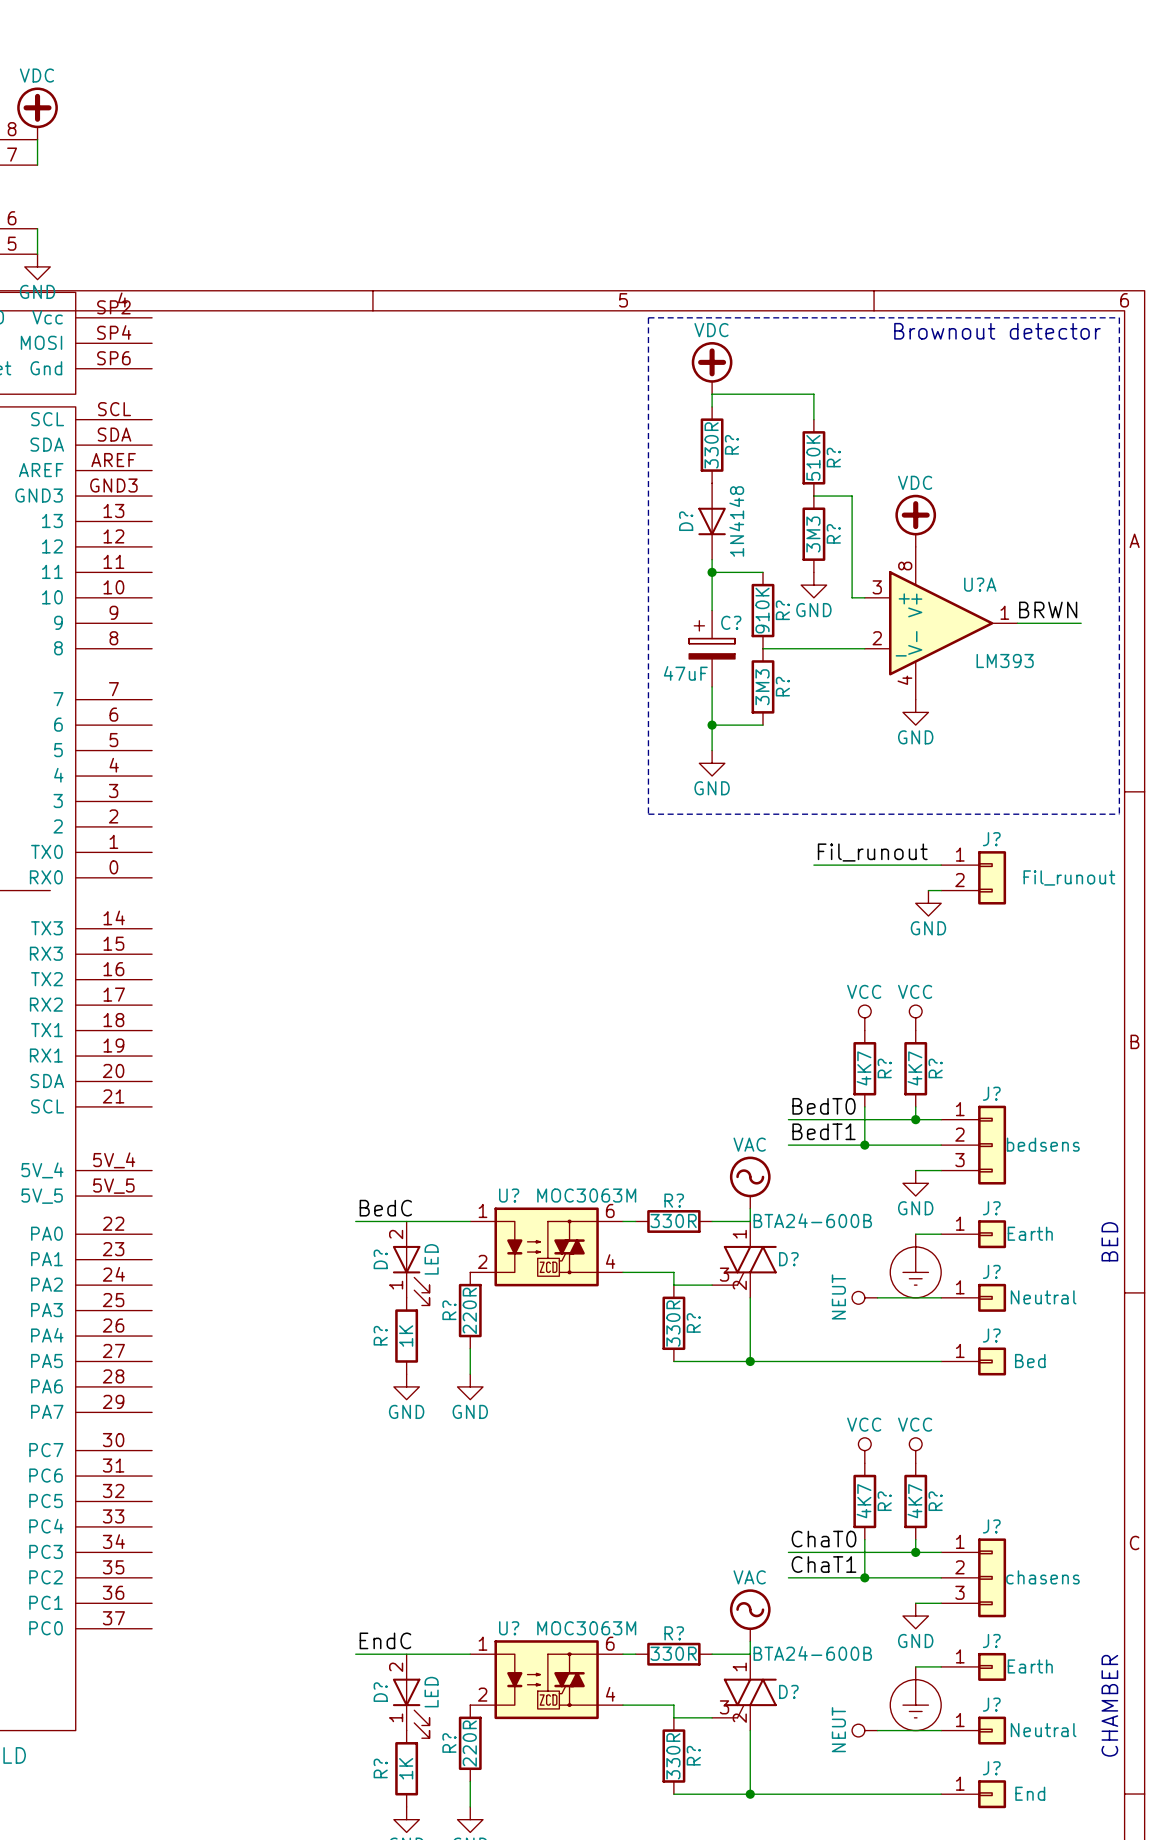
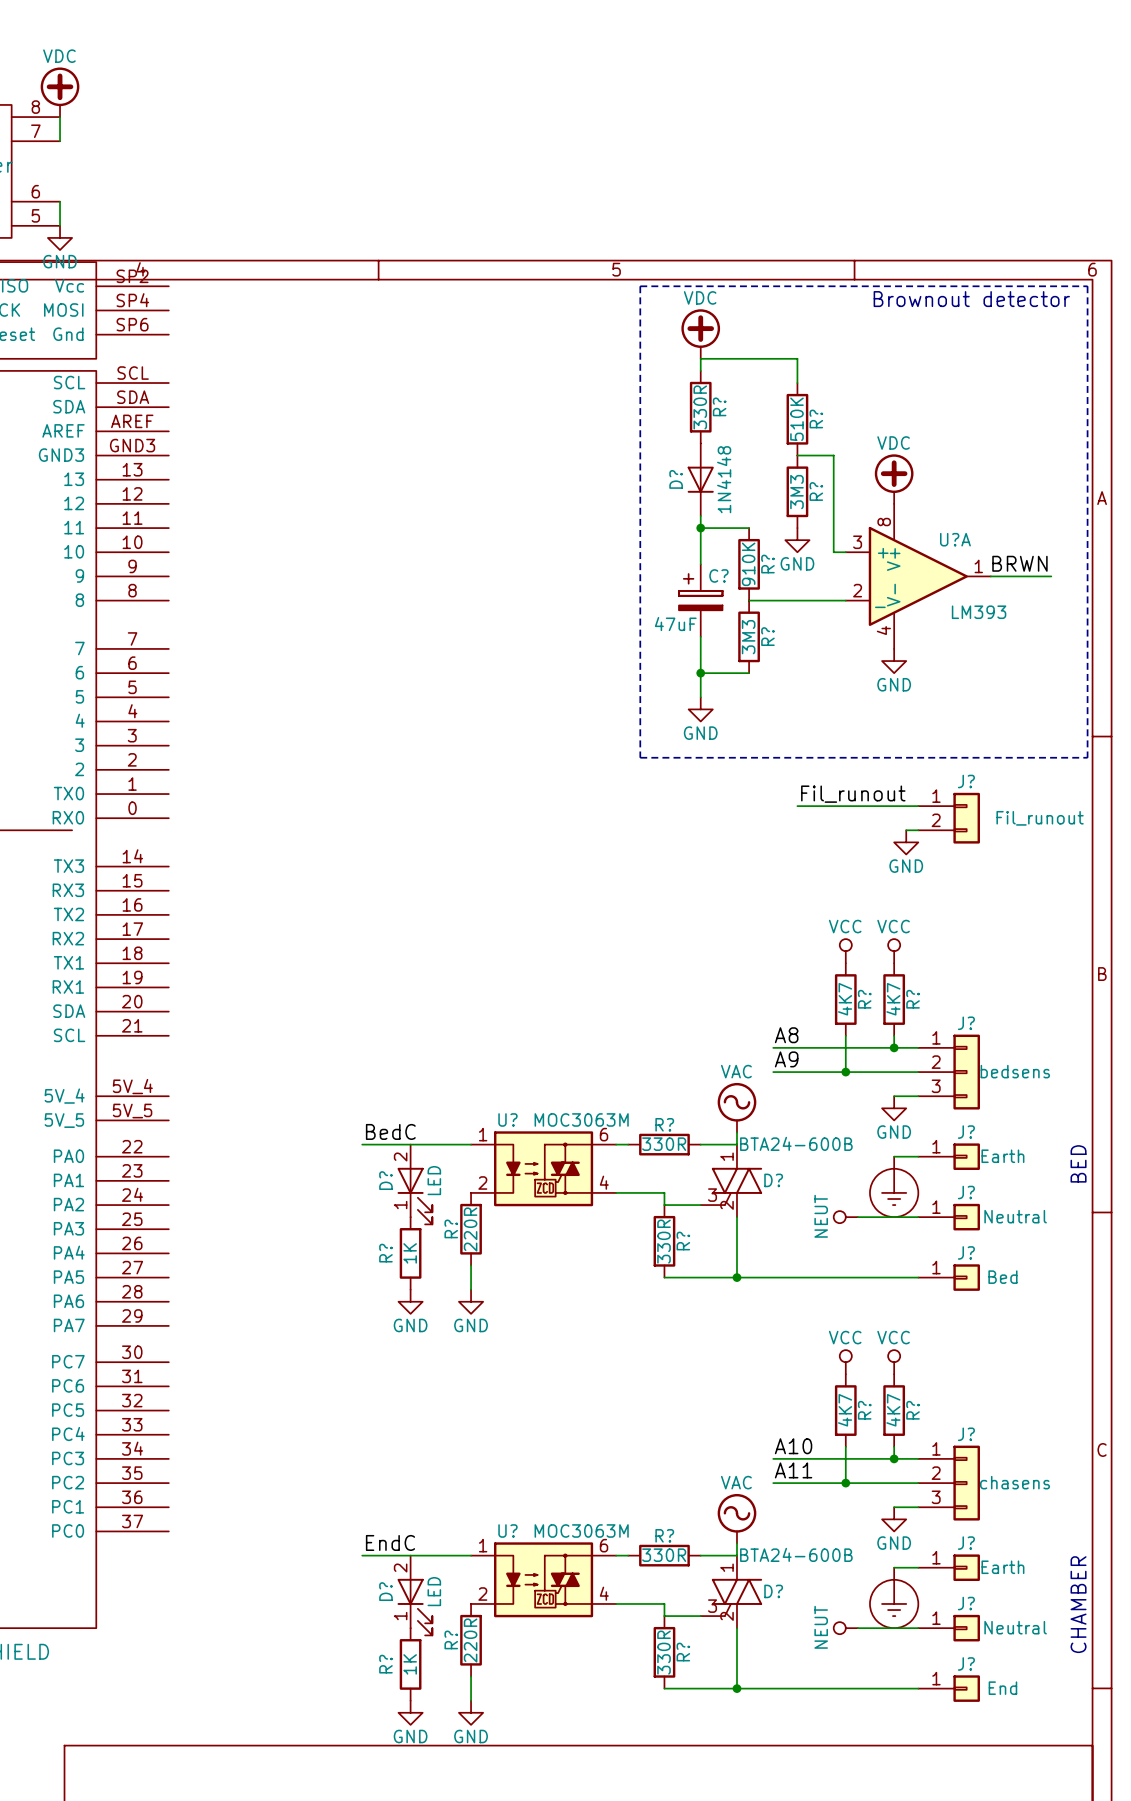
label: BedT0 (824, 1106) -> A8 (786, 1035)
label: BedT1 (824, 1131) -> A9 (786, 1059)
label: ChaT0 (824, 1539) -> A10 (793, 1446)
label: ChaT1 (824, 1564) -> A11 (793, 1470)

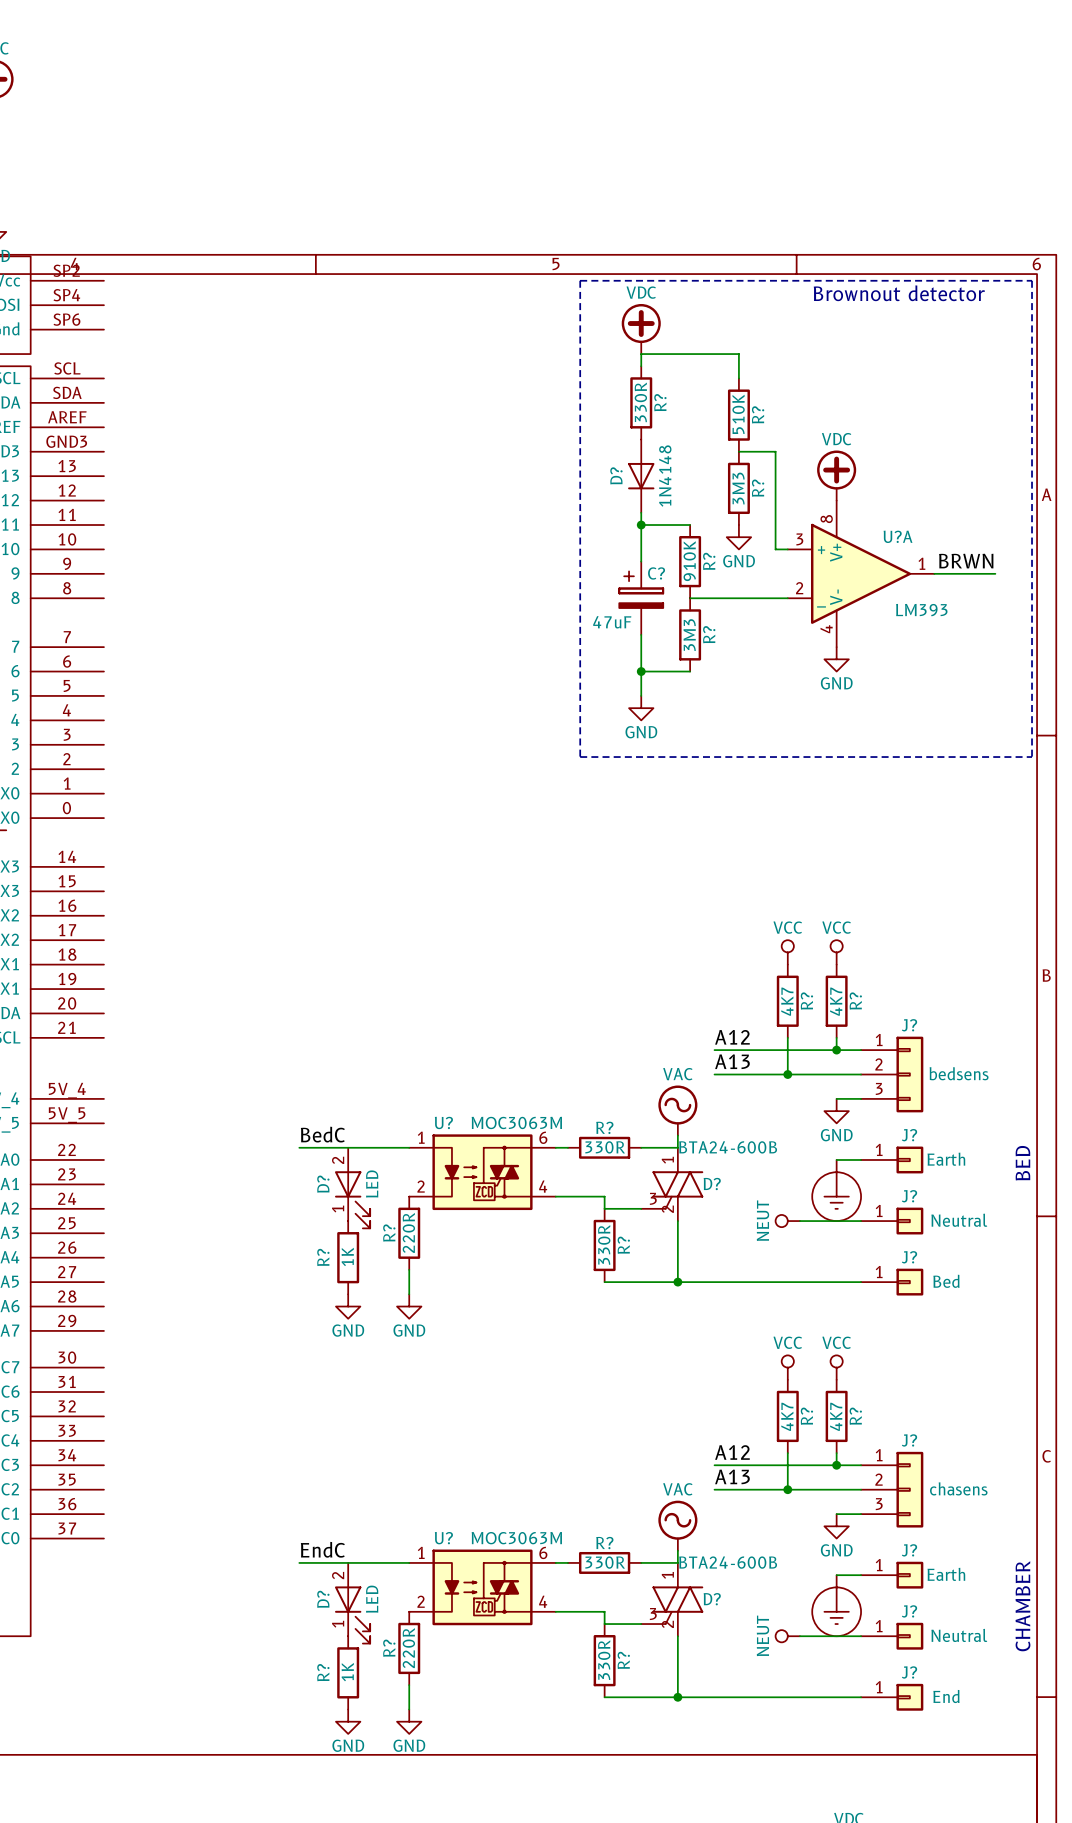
label: Fil_runout (853, 794) -> none
wire: (797, 806) (918, 806) -> none
J?: Fil_runout (949, 818) -> none
wire: (906, 830) (918, 830) -> none
power symbol: GND (906, 842) -> none
label: A8 (786, 1035) -> A12 (732, 1037)
label: A9 (786, 1059) -> A13 (732, 1061)
label: A10 (793, 1446) -> A12 (732, 1452)
label: A11 (793, 1470) -> A13 (732, 1476)

